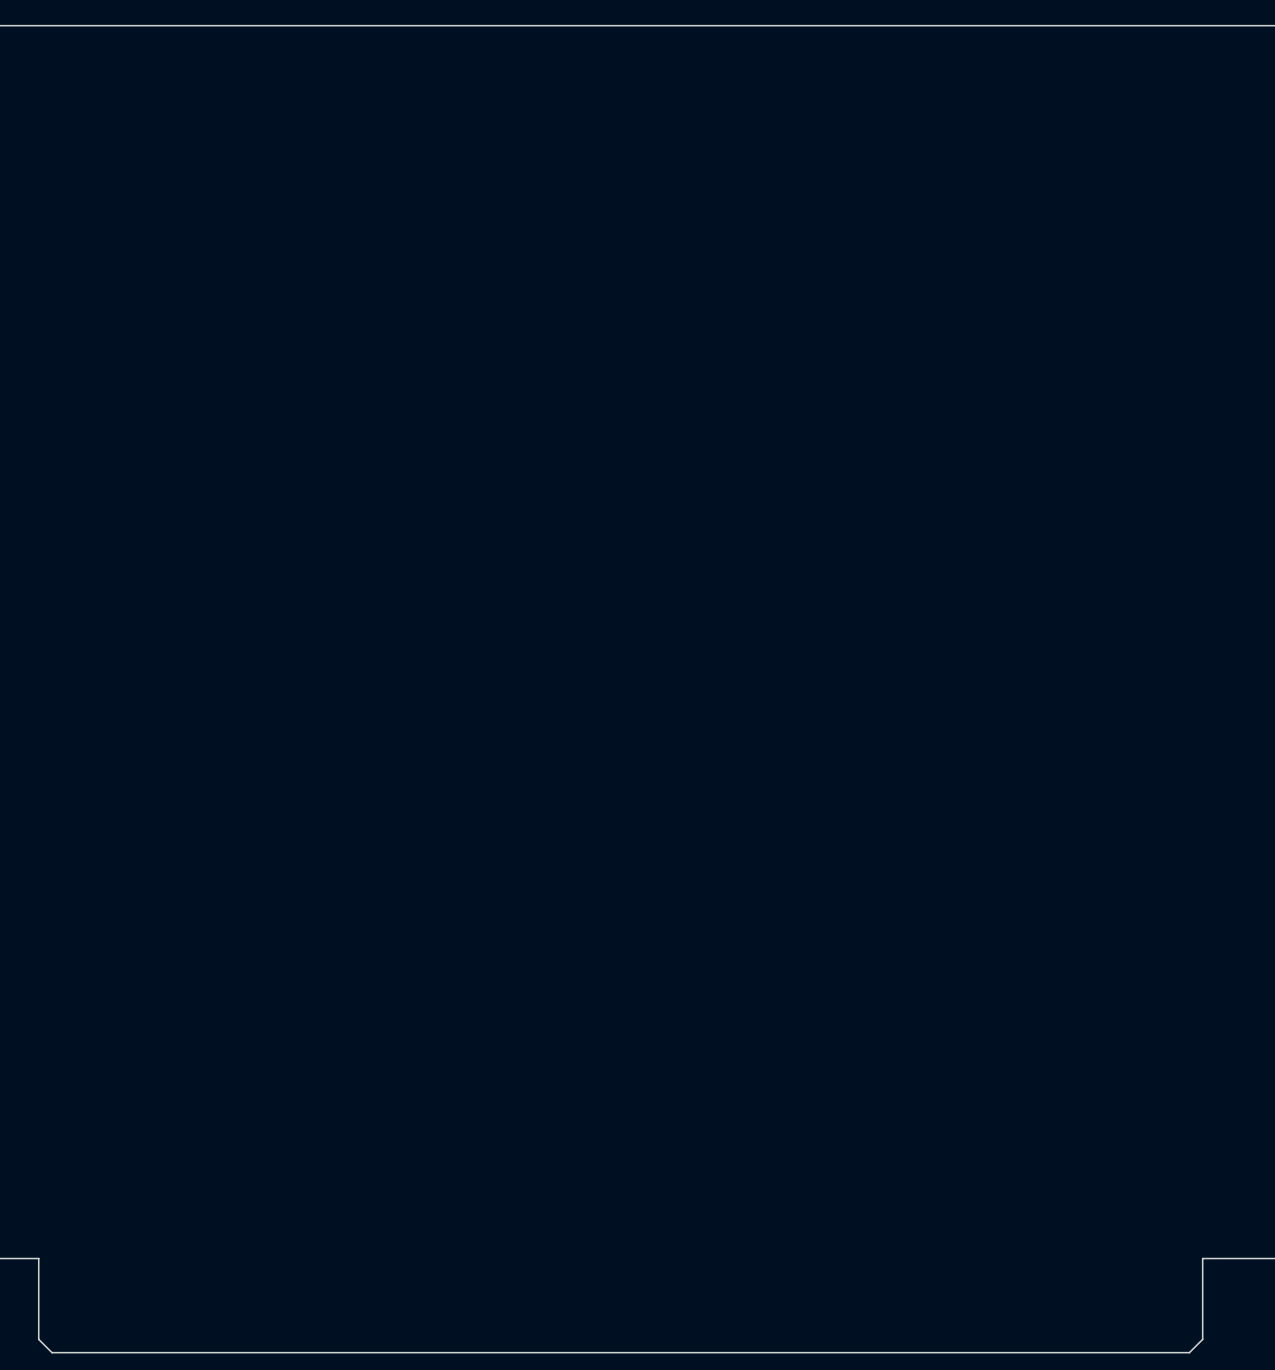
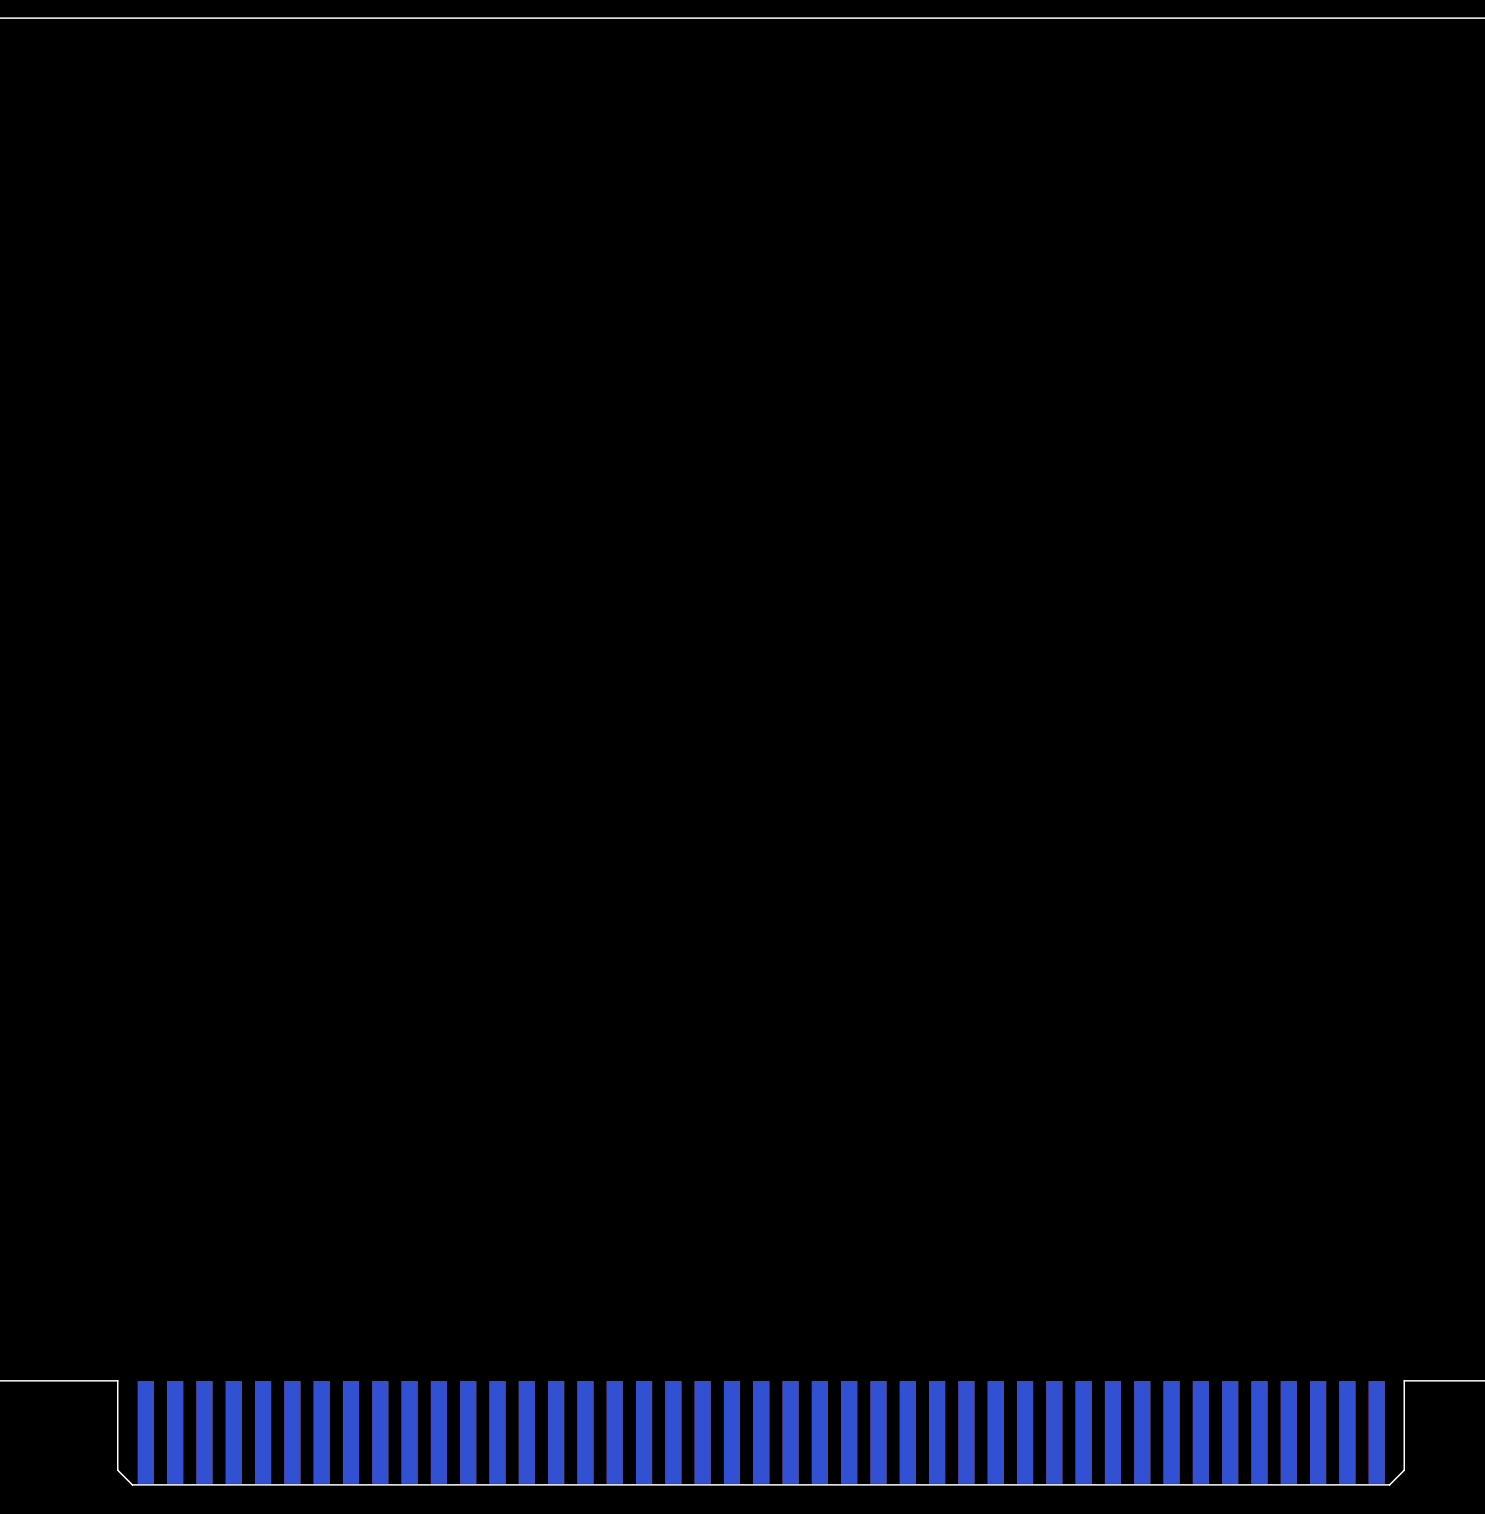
part: none -> (761, 1432)

